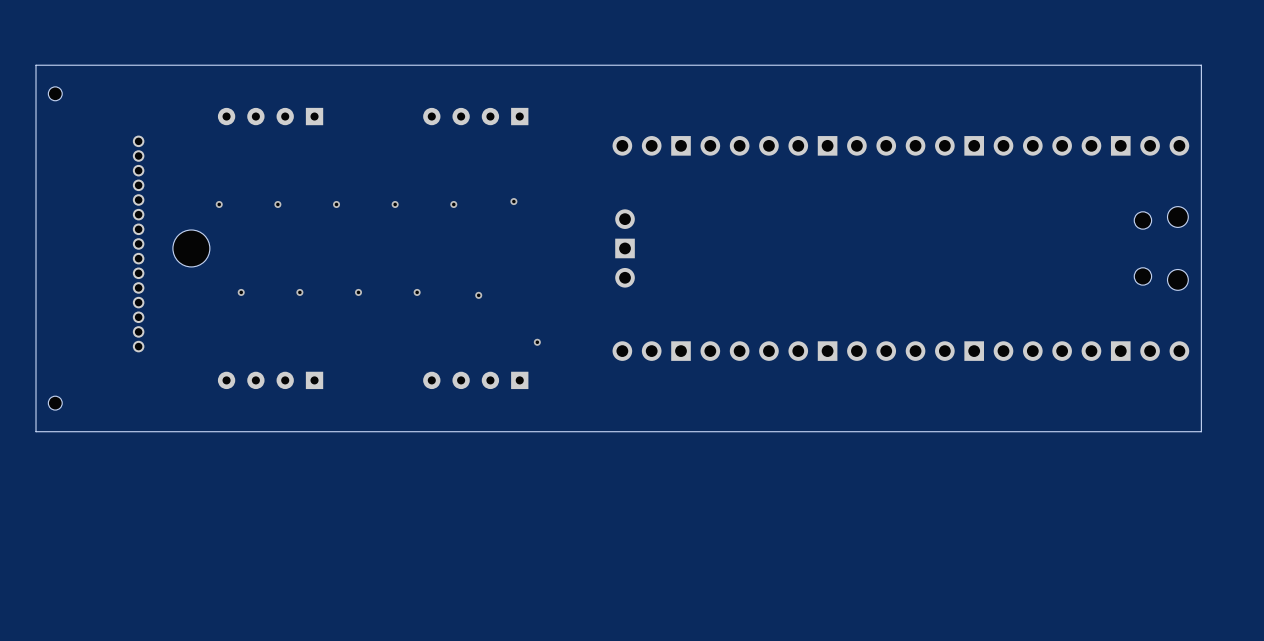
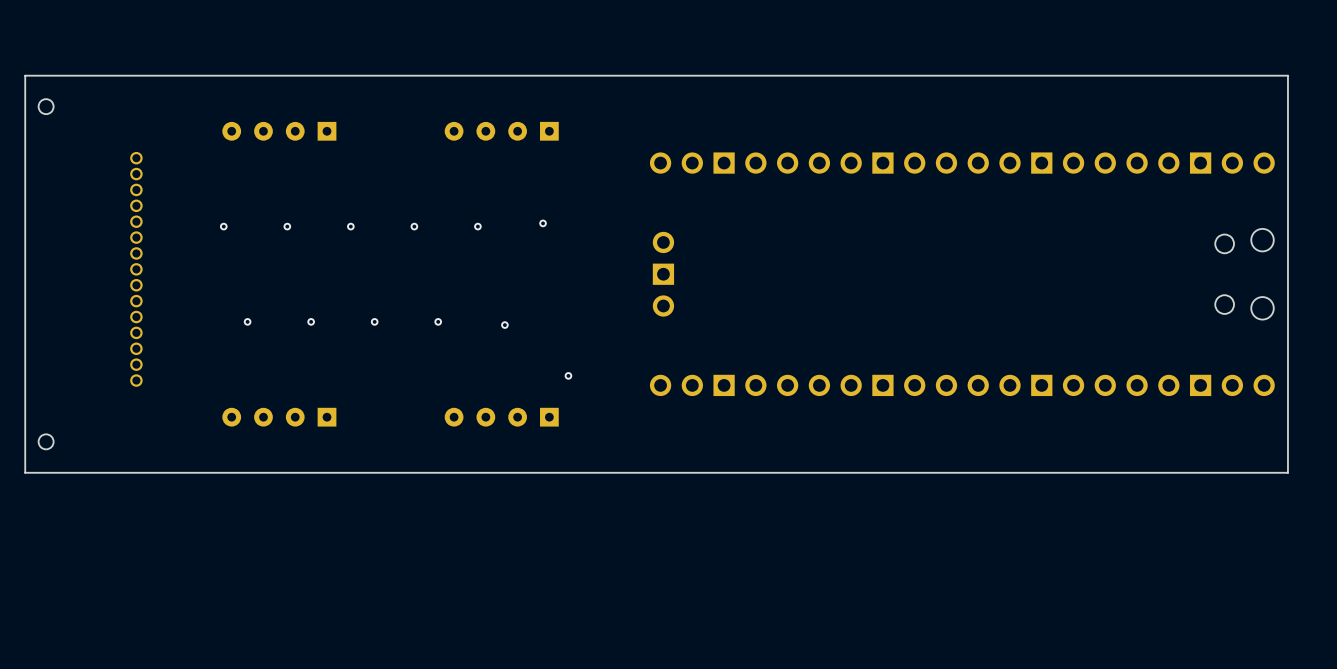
part: (191, 248) -> none

